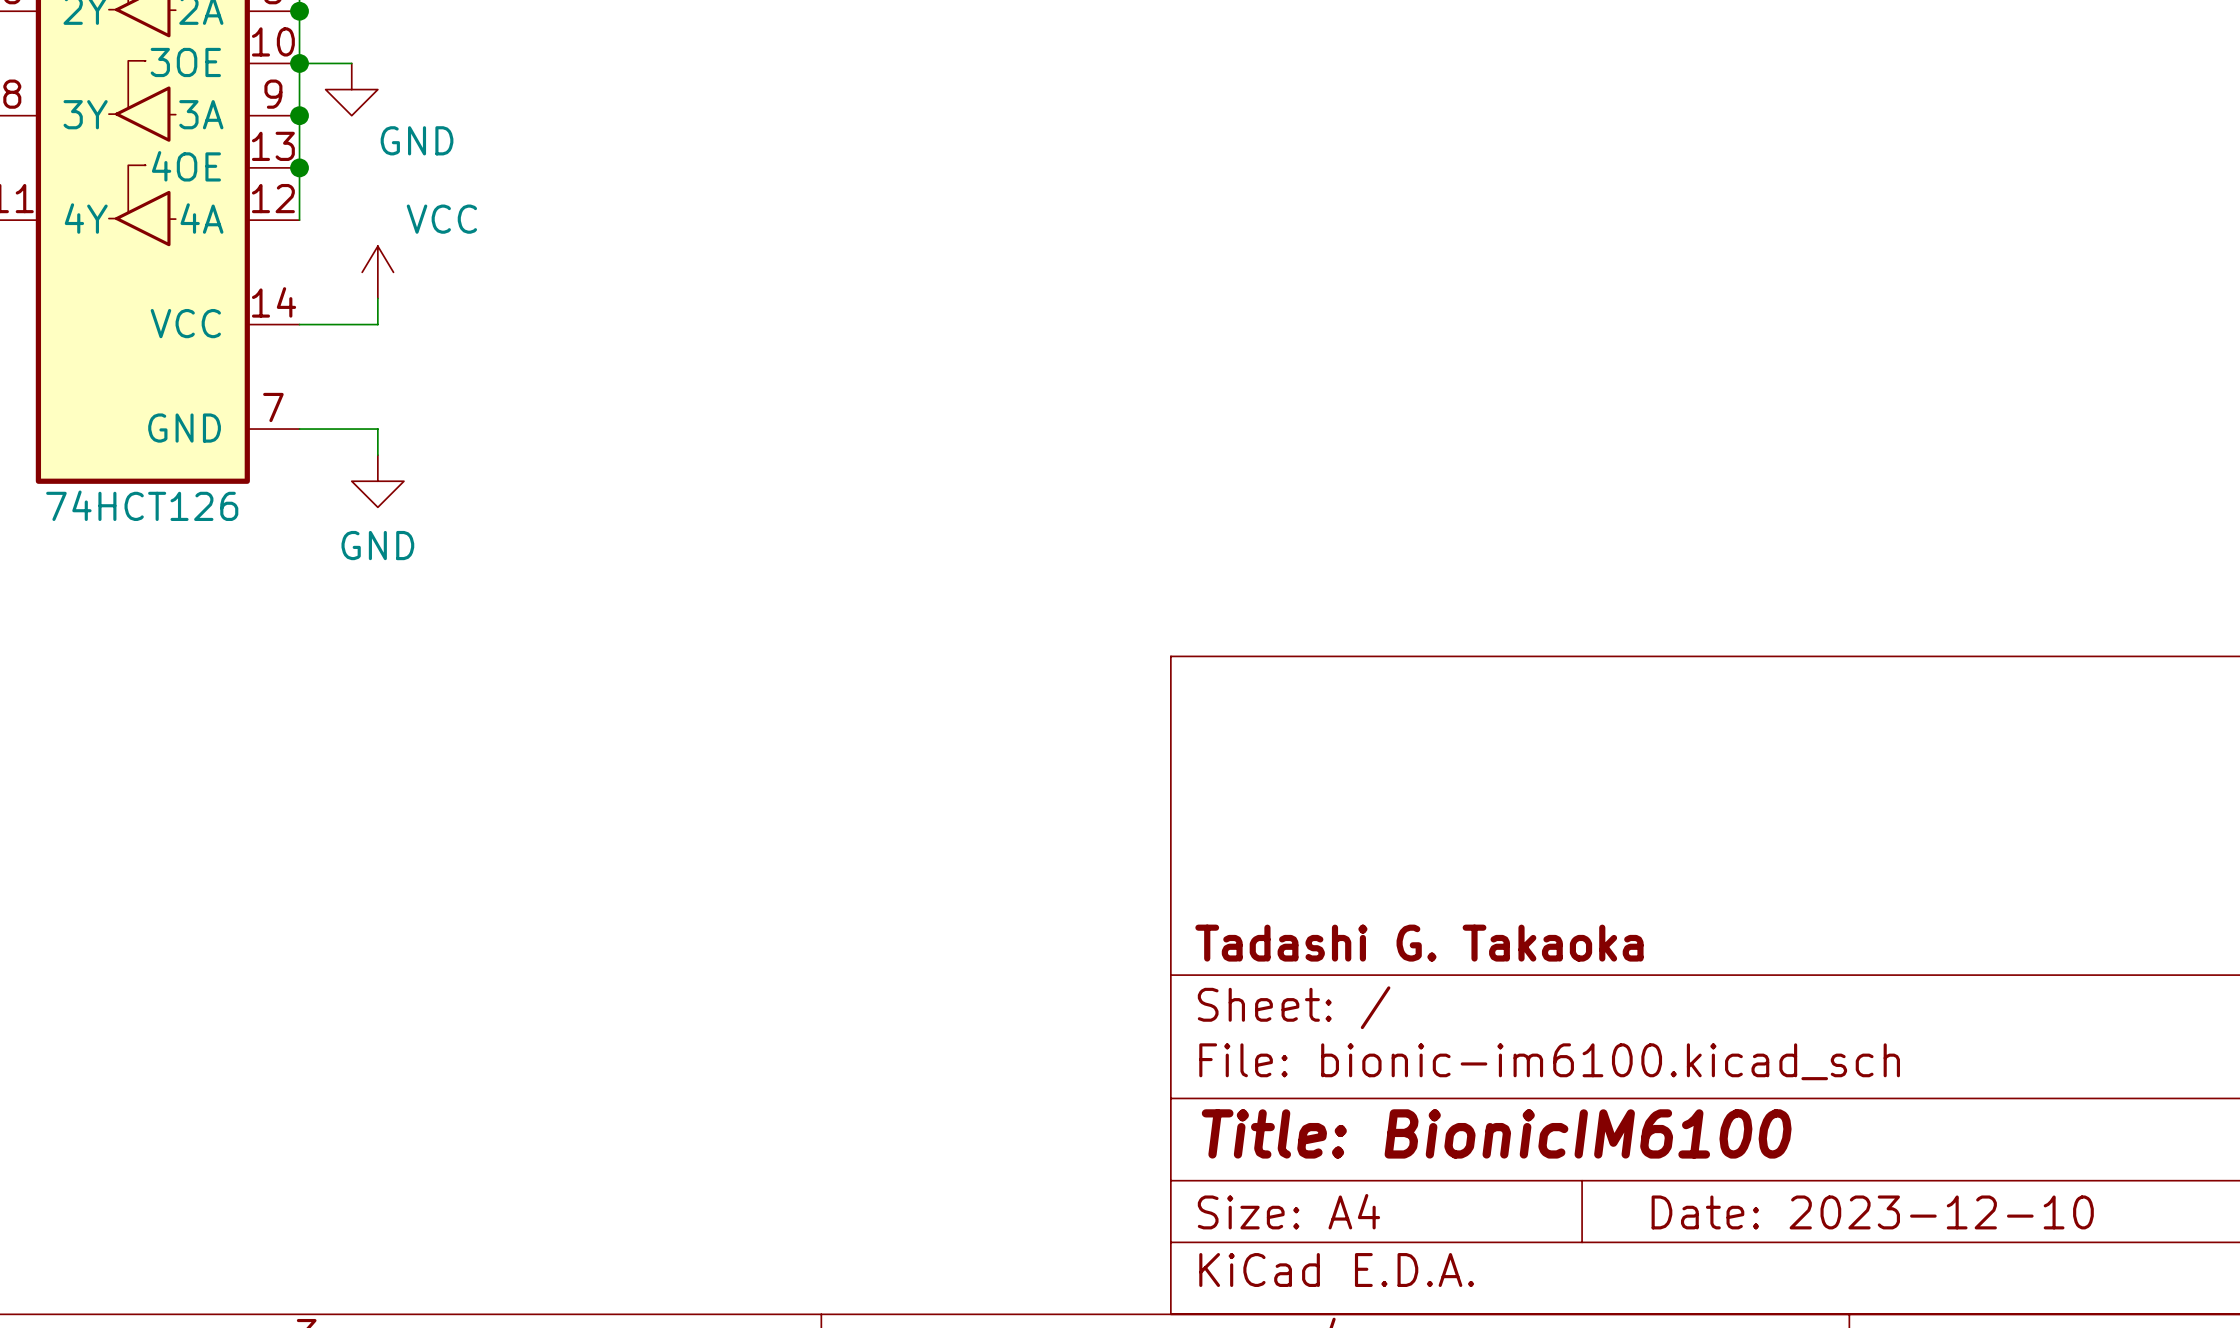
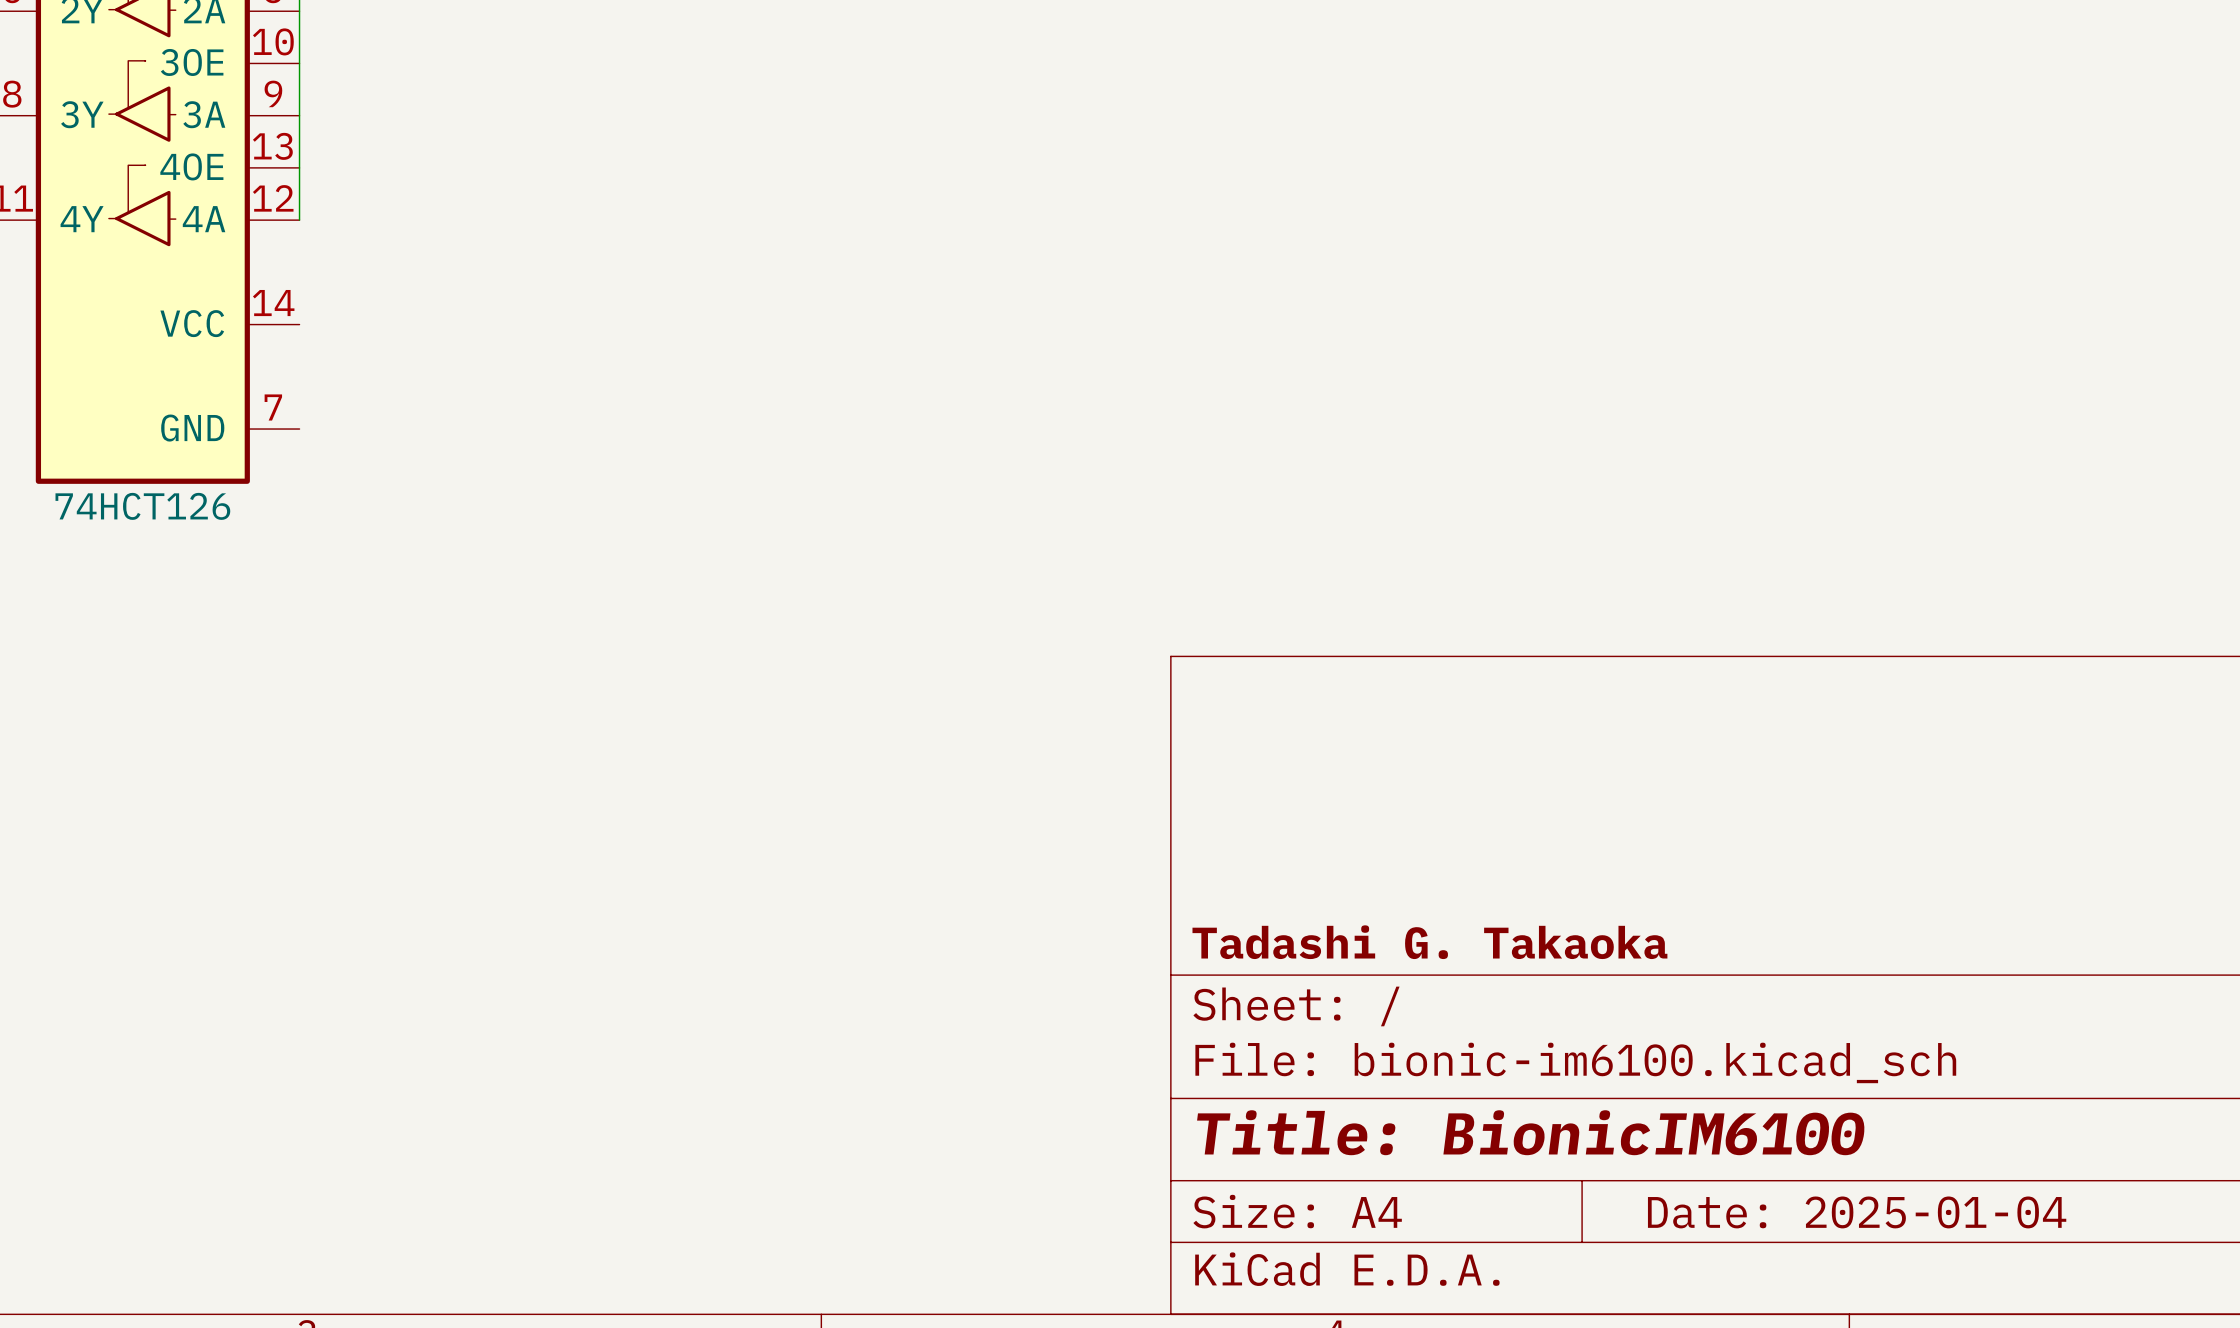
junction: (299, 11) -> none
wire: (299, 63) (351, 63) -> none
junction: (299, 63) -> none
power symbol: GND (351, 89) -> none
junction: (299, 115) -> none
junction: (299, 167) -> none
power symbol: VCC (377, 272) -> none
wire: (377, 298) (377, 324) (299, 324) -> none
wire: (299, 429) (377, 429) (377, 455) -> none
power symbol: GND (377, 481) -> none
title block: Date: 2023-12-10 (1872, 1212) -> Date: 2025-01-04 (1857, 1212)

